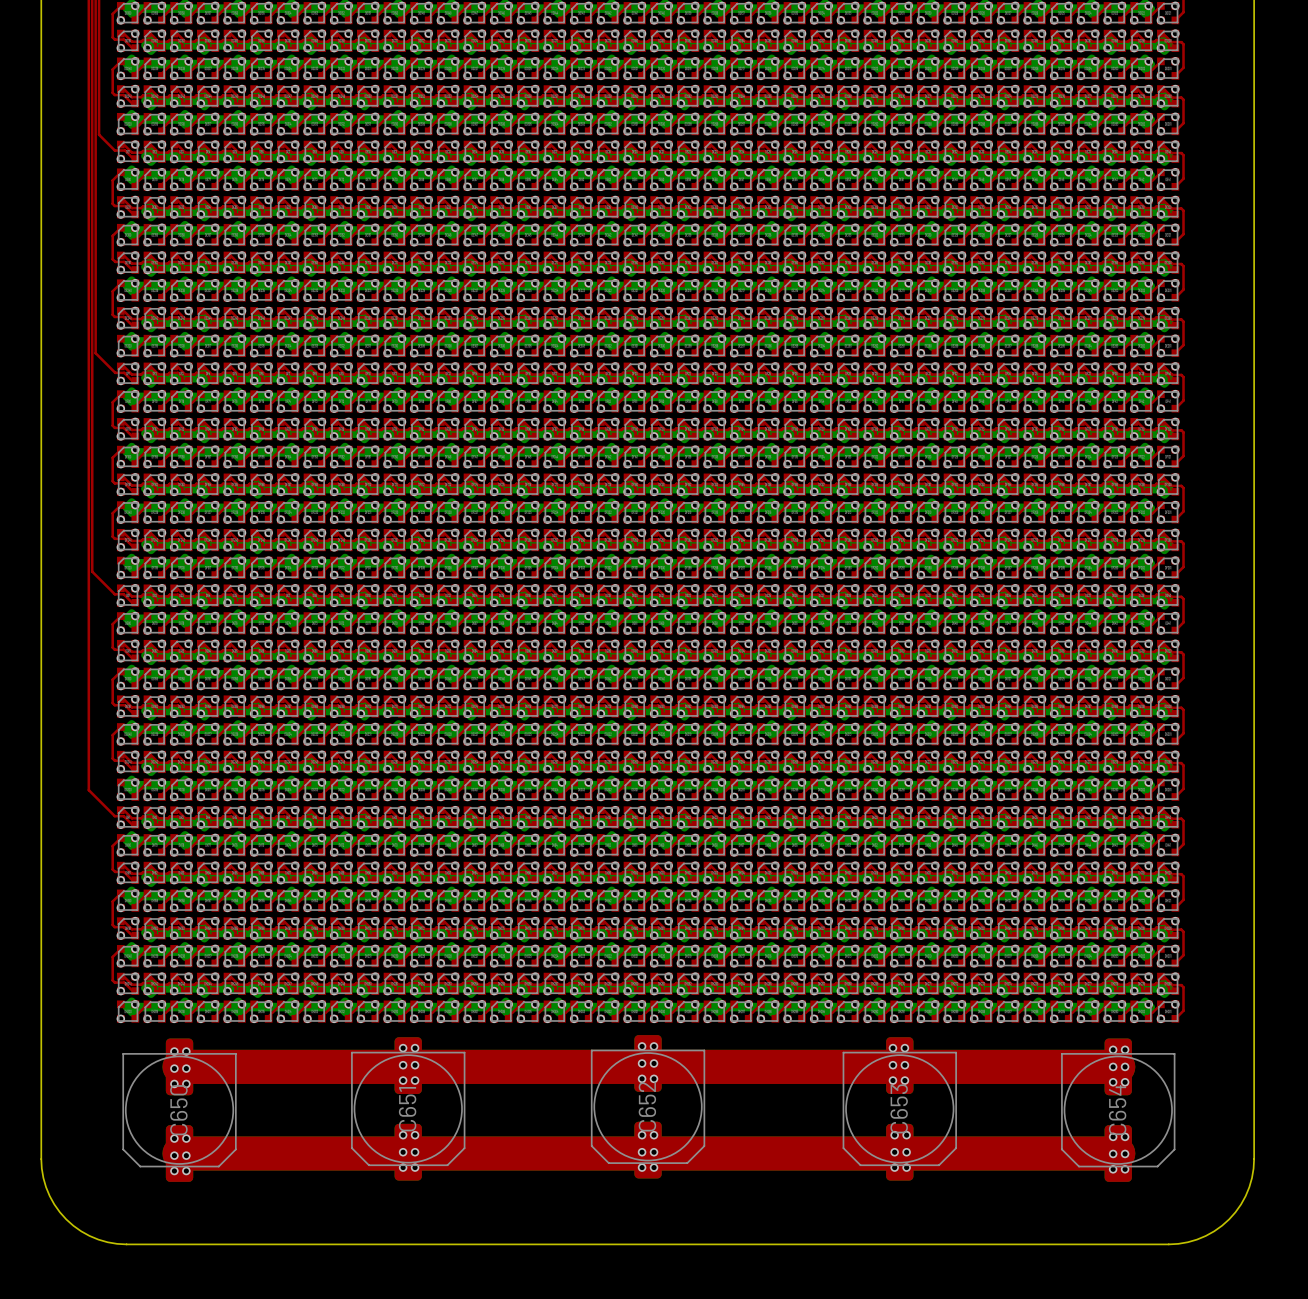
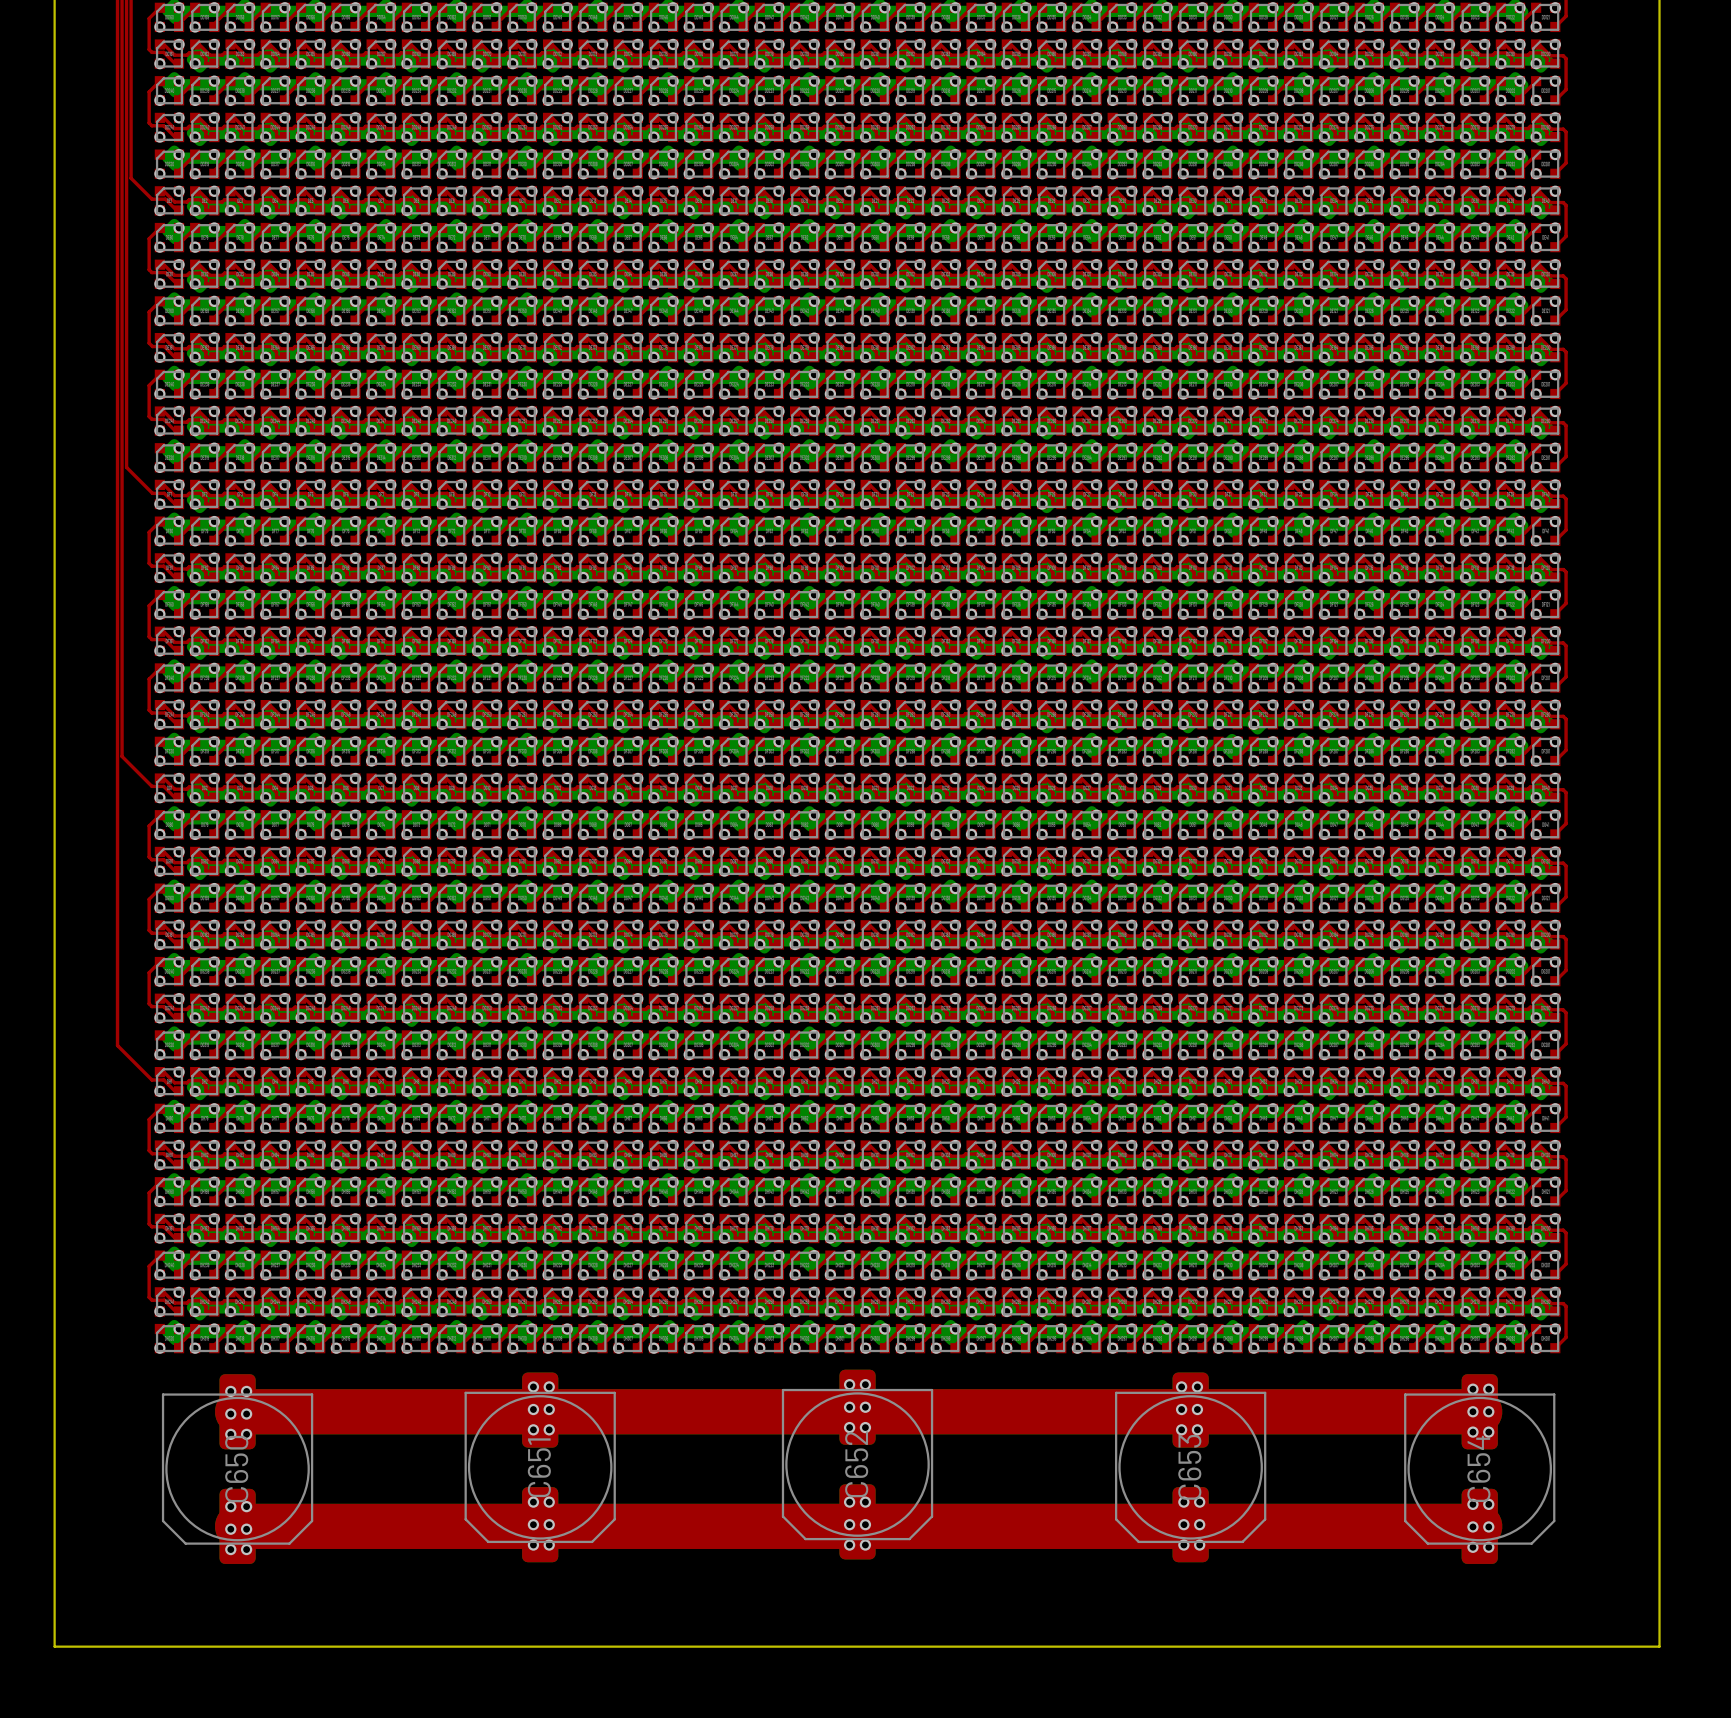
board edge: (41, 1159) (46, 1187) (54, 1204) (66, 1219) (89, 1235) (107, 1242) (126, 1244) -> (54, 1533) (54, 1646) (167, 1646)
board edge: (1254, 1159) (1249, 1187) (1241, 1204) (1229, 1219) (1214, 1231) (1196, 1239) (1168, 1244) -> (1659, 1533) (1659, 1646) (1546, 1646)

